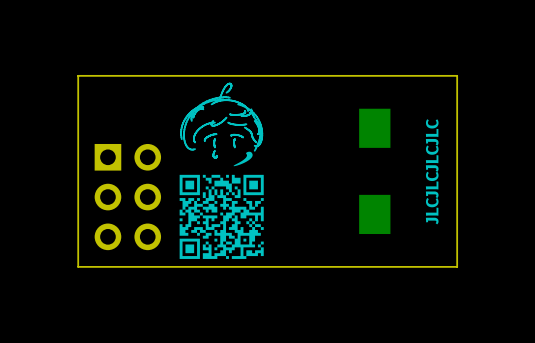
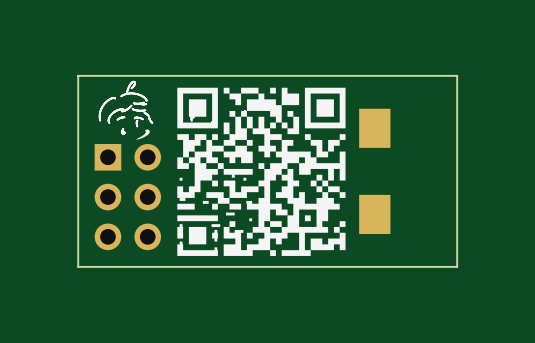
line: none -> (133, 81) (130, 84) (126, 92)
line: none -> (134, 82) (131, 88)
drawing: none -> [177, 87, 346, 256]
line: (226, 92) (231, 87) (230, 83) (224, 87) (219, 99) -> none
line: none -> (121, 96) (135, 93) (143, 96) (146, 100)
line: (229, 97) (209, 100) (191, 111) (182, 124) (181, 139) -> none
line: none -> (115, 98) (110, 99) (103, 105) (100, 112) (100, 120)
line: (223, 99) (201, 105) (188, 117) (184, 129) (184, 140) (188, 148) (195, 149) -> none
line: none -> (143, 102) (133, 103)
line: none -> (146, 104) (141, 104)
line: (211, 104) (222, 100) (232, 100) (243, 105) (248, 110) -> none
line: (238, 104) (252, 111) (259, 122) (261, 140) (258, 145) (254, 145) -> none
line: none -> (131, 105) (121, 111)
line: none -> (123, 109) (112, 113) (108, 118) (109, 123)
line: none -> (132, 109) (145, 110)
line: (251, 109) (260, 131) (254, 150) -> none
line: none -> (144, 112) (148, 115)
line: (245, 112) (229, 114) -> none
line: (248, 114) (241, 115) -> none
line: none -> (149, 116) (152, 123)
line: none -> (124, 117) (117, 119)
line: none -> (135, 117) (142, 119)
line: (226, 117) (218, 124) (211, 125) -> none
line: (254, 120) (259, 129) (258, 134) -> none
line: (214, 122) (206, 124) (198, 129) (194, 136) (195, 142) -> none
line: (228, 122) (246, 124) -> none
line: none -> (136, 123) (137, 126)
line: (244, 127) (250, 131) (256, 142) -> none
line: none -> (123, 128) (122, 131)
drawing: none -> [136, 129, 150, 140]
line: (216, 134) (205, 139) -> none
line: (231, 135) (243, 137) -> none
line: (214, 139) (214, 141) -> none
line: (234, 141) (234, 147) -> none
line: (214, 142) (214, 147) -> none
line: (214, 150) (213, 156) -> none
drawing: [179, 151, 264, 259] -> none
line: (216, 155) (216, 156) -> none
text: JLCJLCJLCJLC (432, 171) -> none
drawing shape: [202, 174, 206, 178] -> [194, 174, 213, 181]
drawing shape: [214, 192, 218, 196] -> [206, 192, 224, 198]
drawing shape: [260, 198, 264, 201] -> [258, 197, 271, 204]
drawing shape: [223, 200, 227, 204] -> [217, 197, 230, 204]
drawing shape: [194, 227, 203, 230] -> [188, 226, 207, 233]
drawing shape: [260, 227, 264, 230] -> [252, 226, 271, 233]
drawing shape: [197, 232, 200, 236] -> [188, 232, 207, 239]
drawing shape: [228, 235, 235, 239] -> [223, 232, 242, 239]
drawing shape: [197, 241, 200, 245] -> [188, 238, 207, 245]
drawing shape: [260, 241, 264, 245] -> [258, 238, 271, 245]
drawing shape: [257, 244, 261, 248] -> [246, 244, 271, 251]

